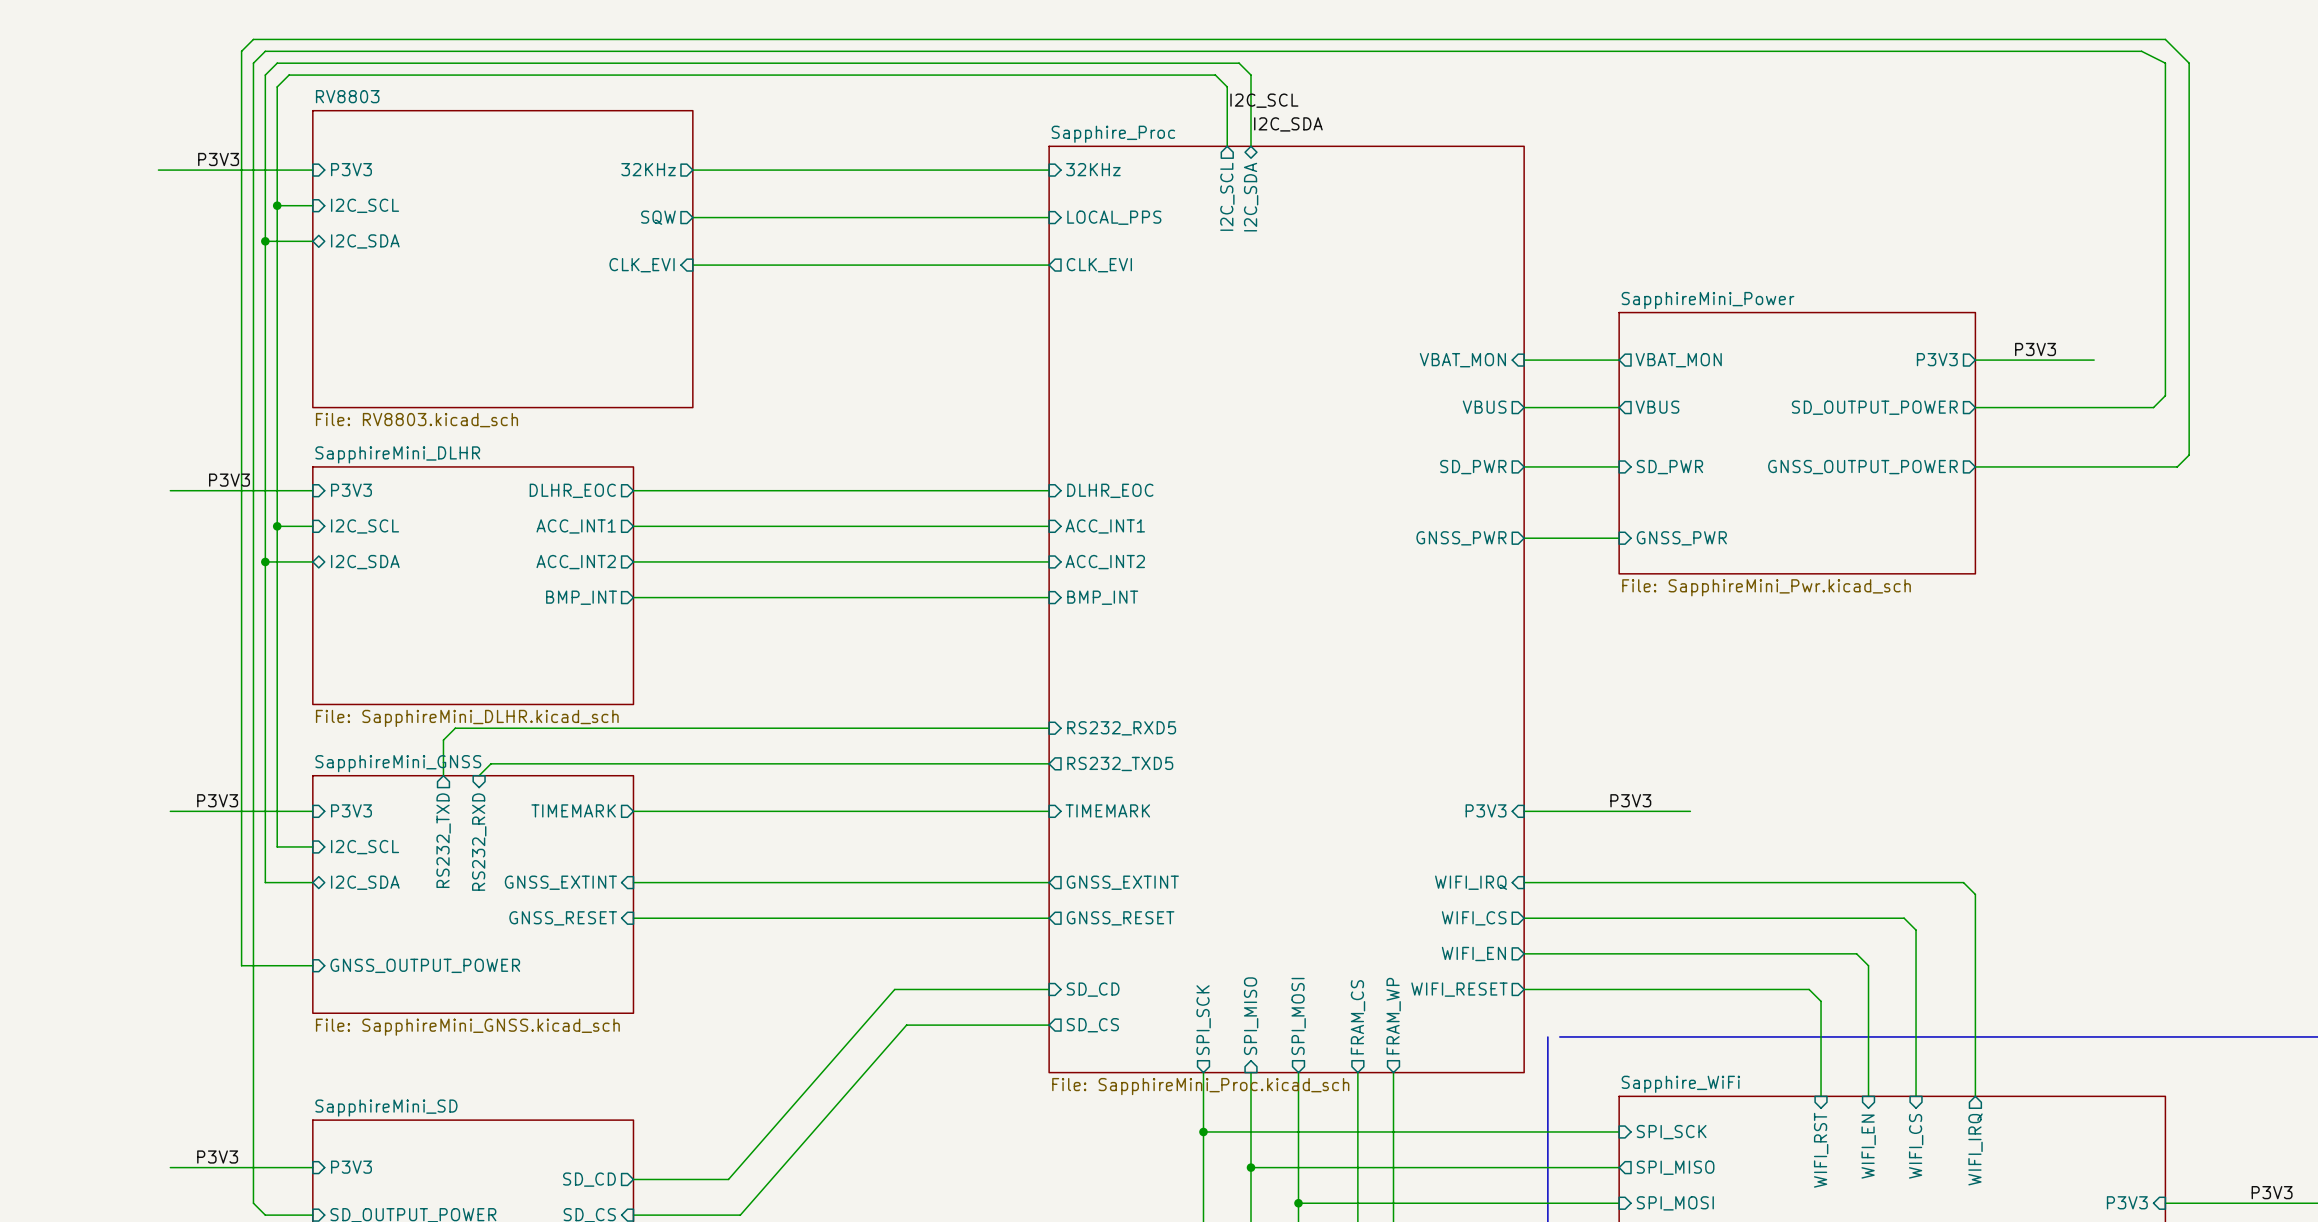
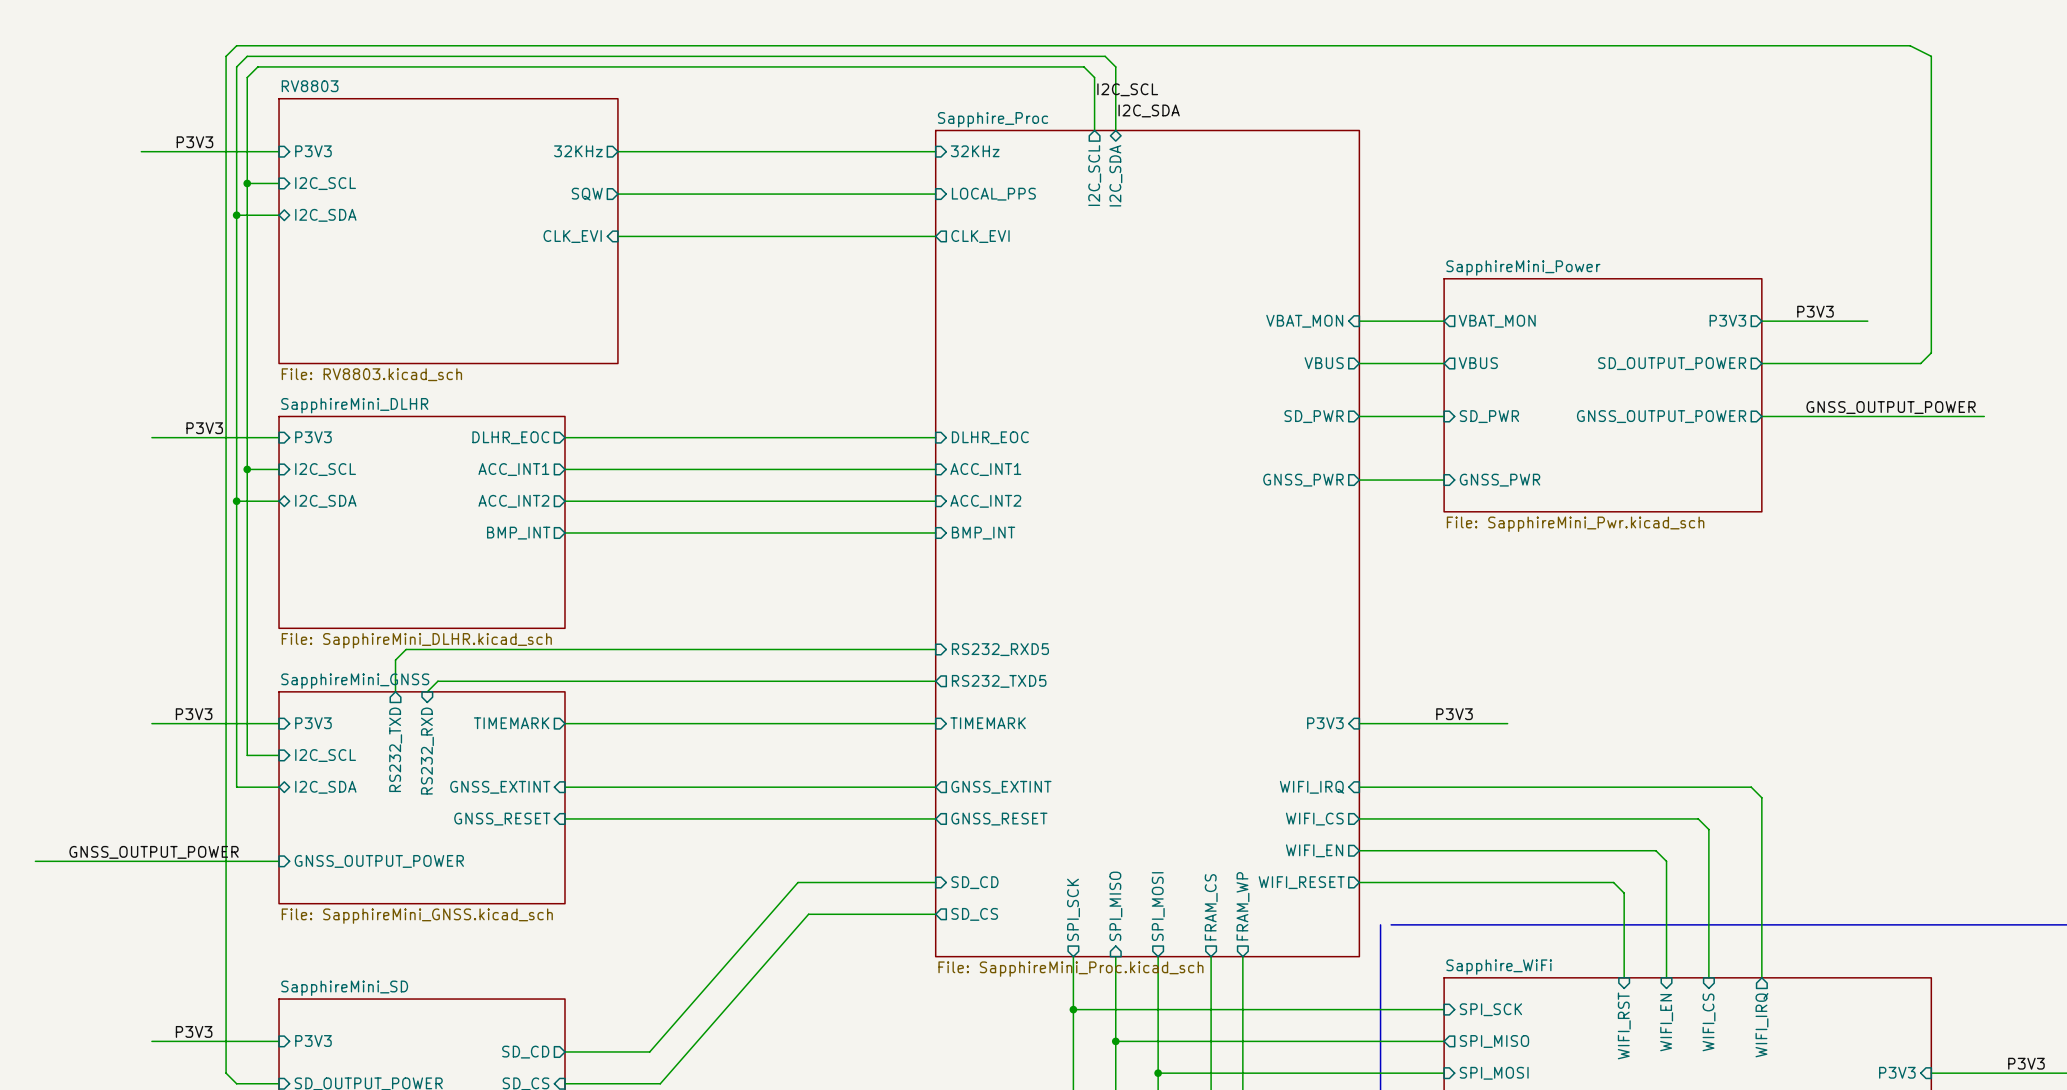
label: none -> GNSS_OUTPUT_POWER (1891, 407)
wire: (2177, 466) (2189, 455) (2189, 63) (2165, 39) (253, 39) (241, 51) (241, 965) -> (1941, 416) (1984, 416)
label: none -> GNSS_OUTPUT_POWER (154, 852)
wire: none -> (35, 861) (215, 861)

